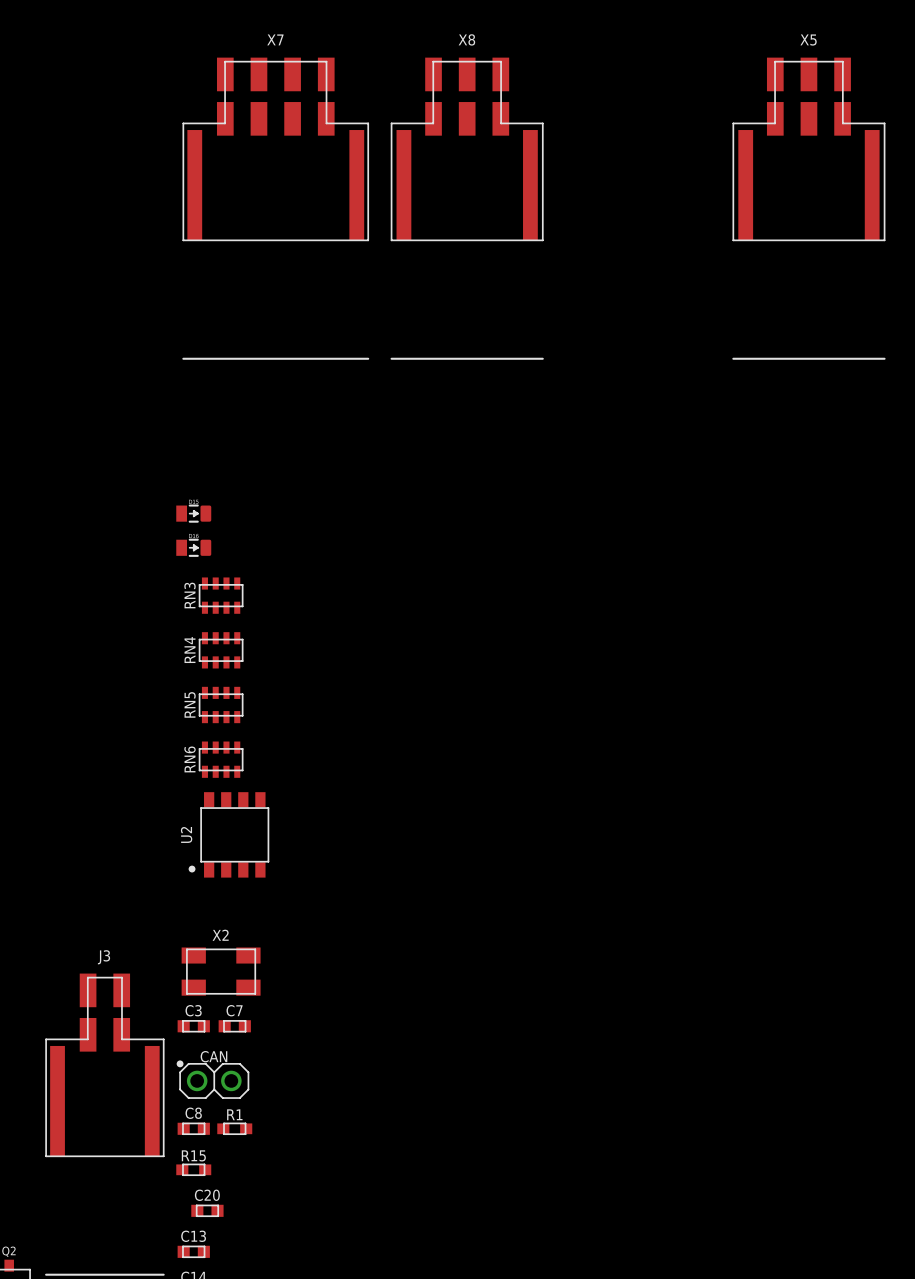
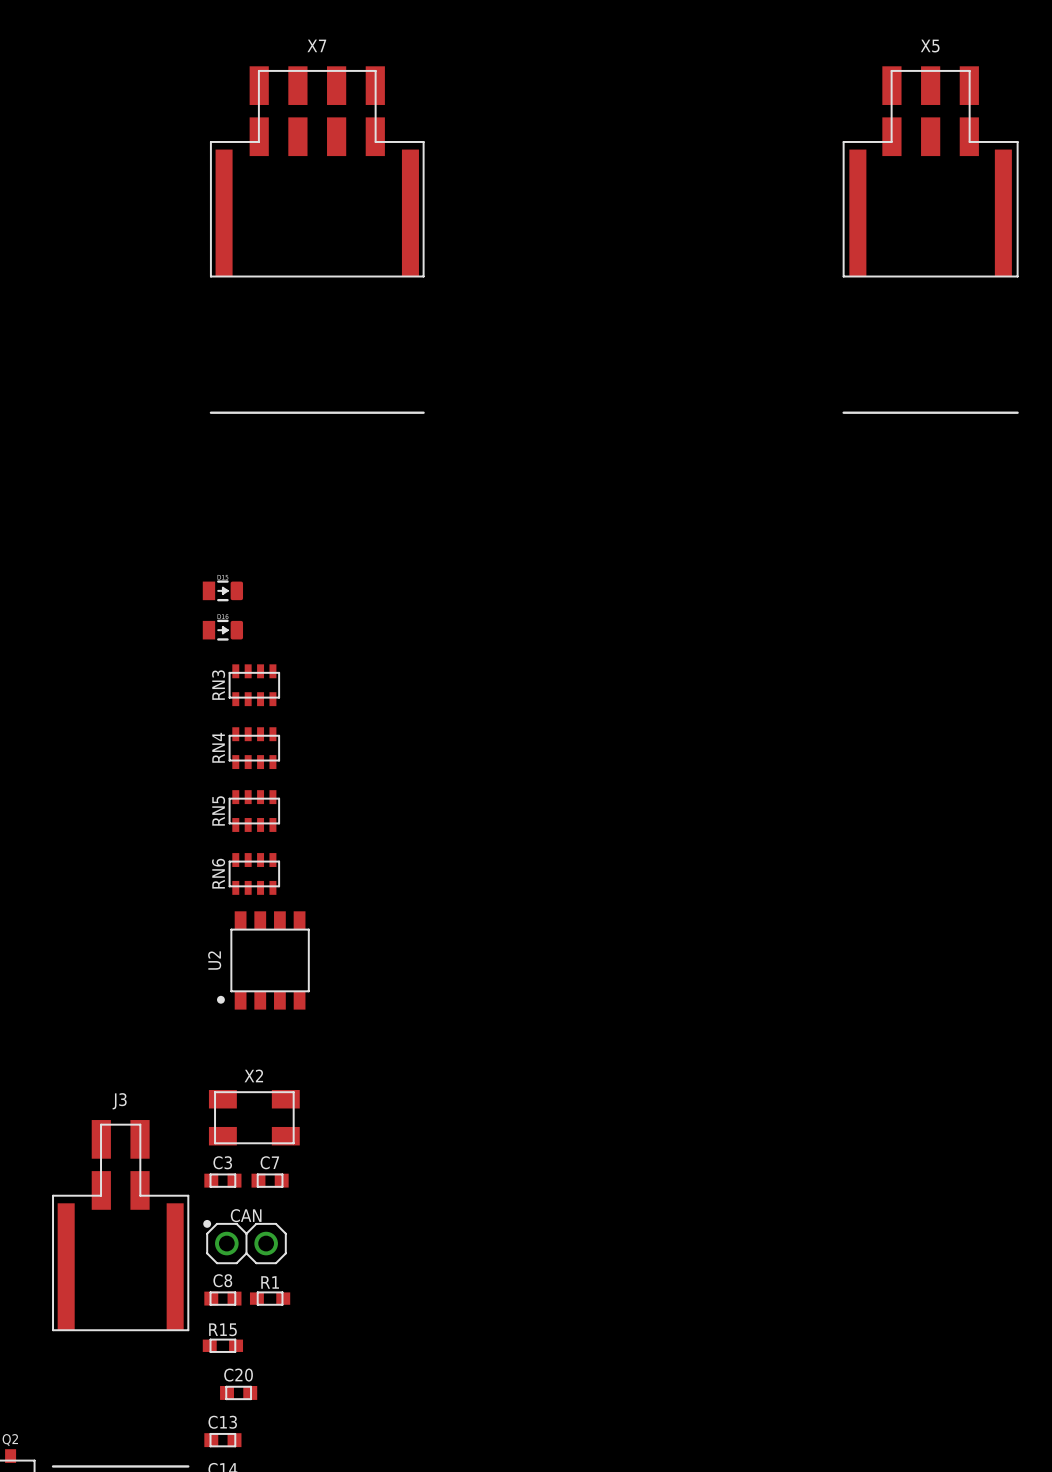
X8: (467, 208) -> none

